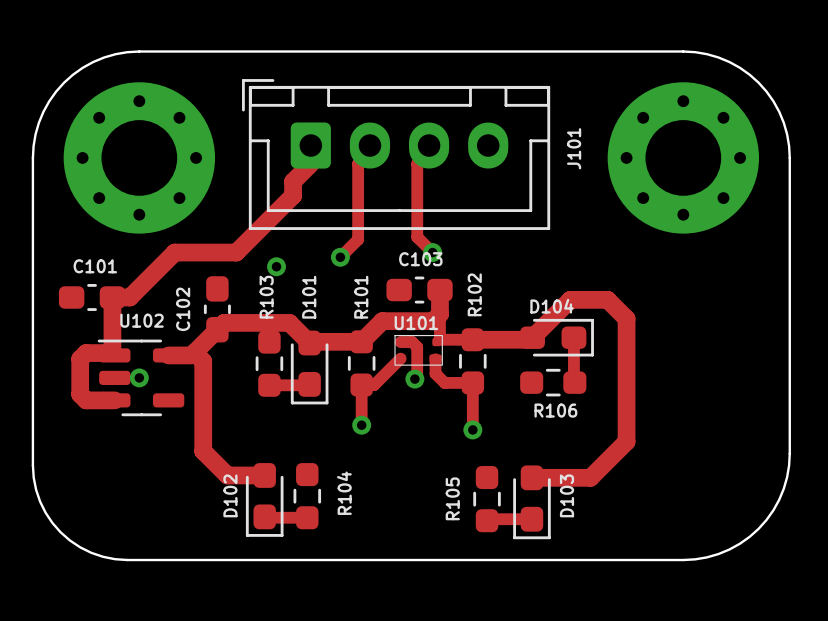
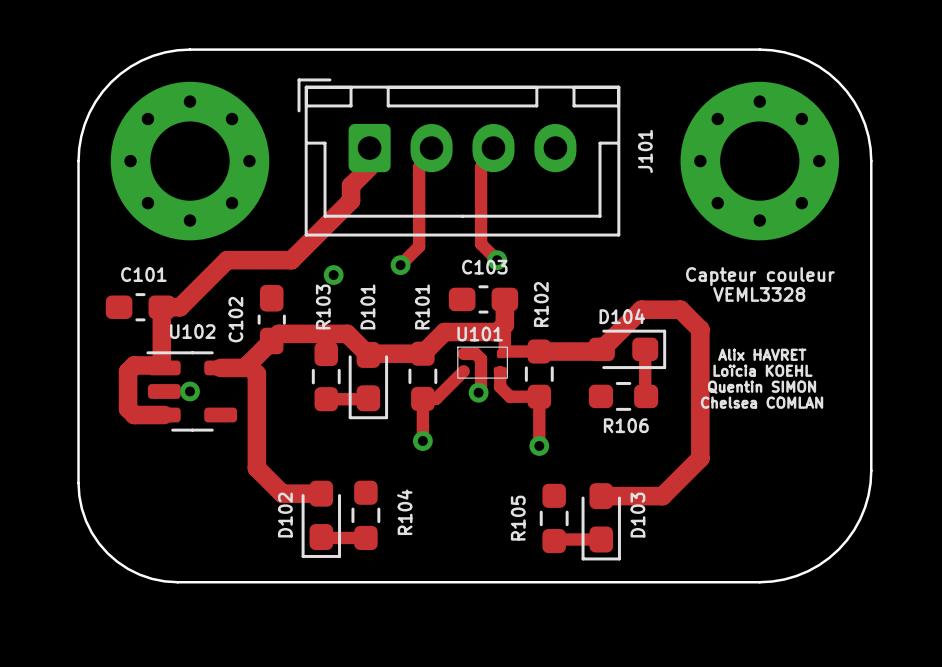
text: none -> Capteur couleur (760, 276)
text: none -> VEML3328 (759, 294)
text: none -> Alix HAVRET (762, 354)
text: none -> Loïcia KOEHL (762, 370)
text: none -> Quentin SIMON (762, 387)
text: none -> Chelsea COMLAN (762, 402)

